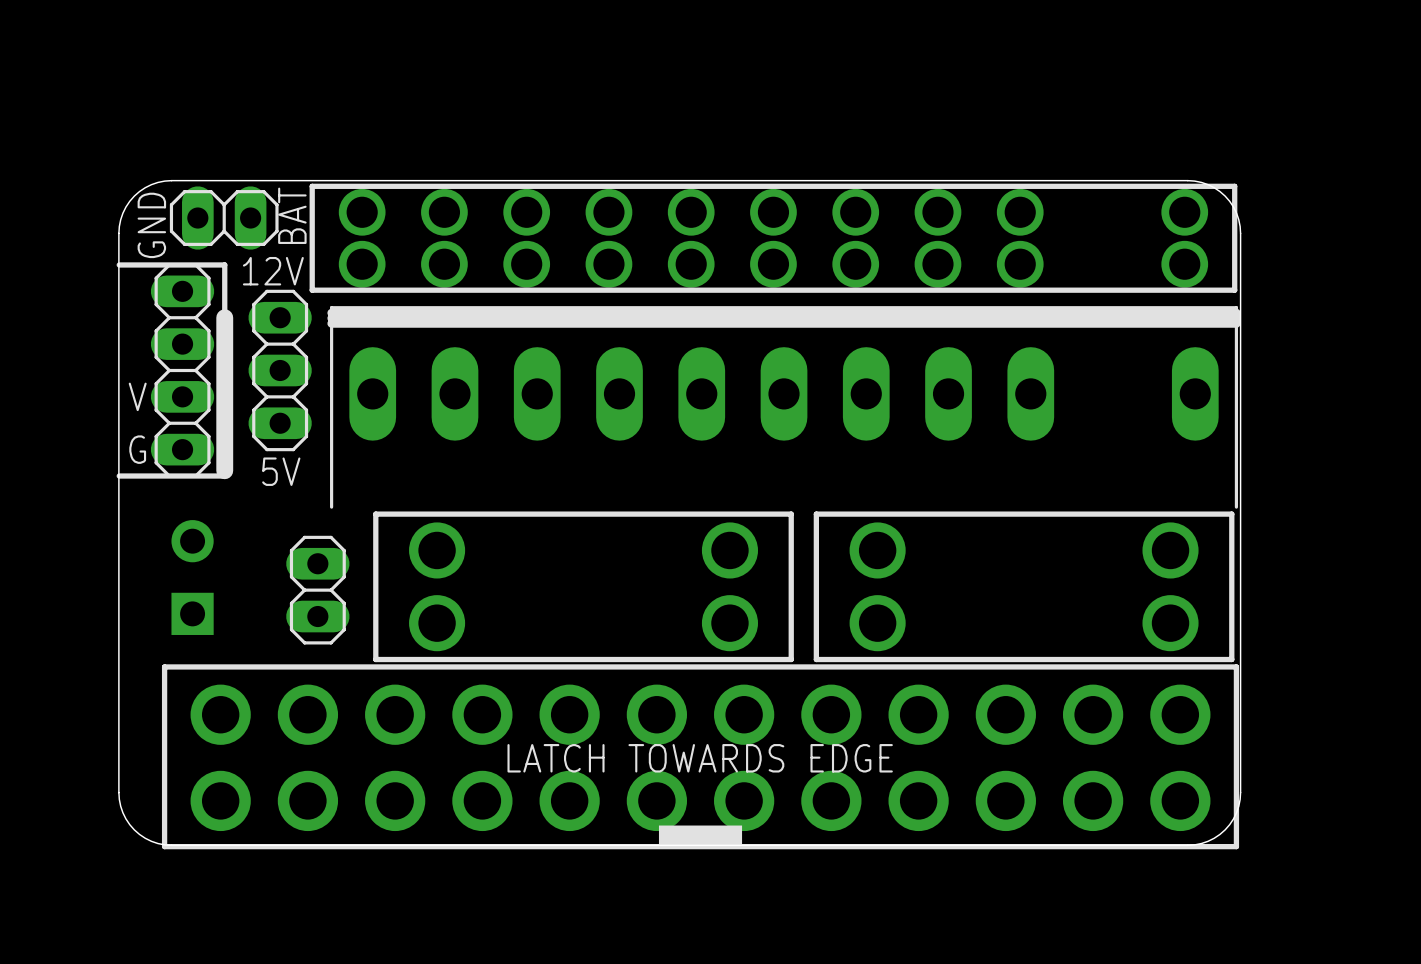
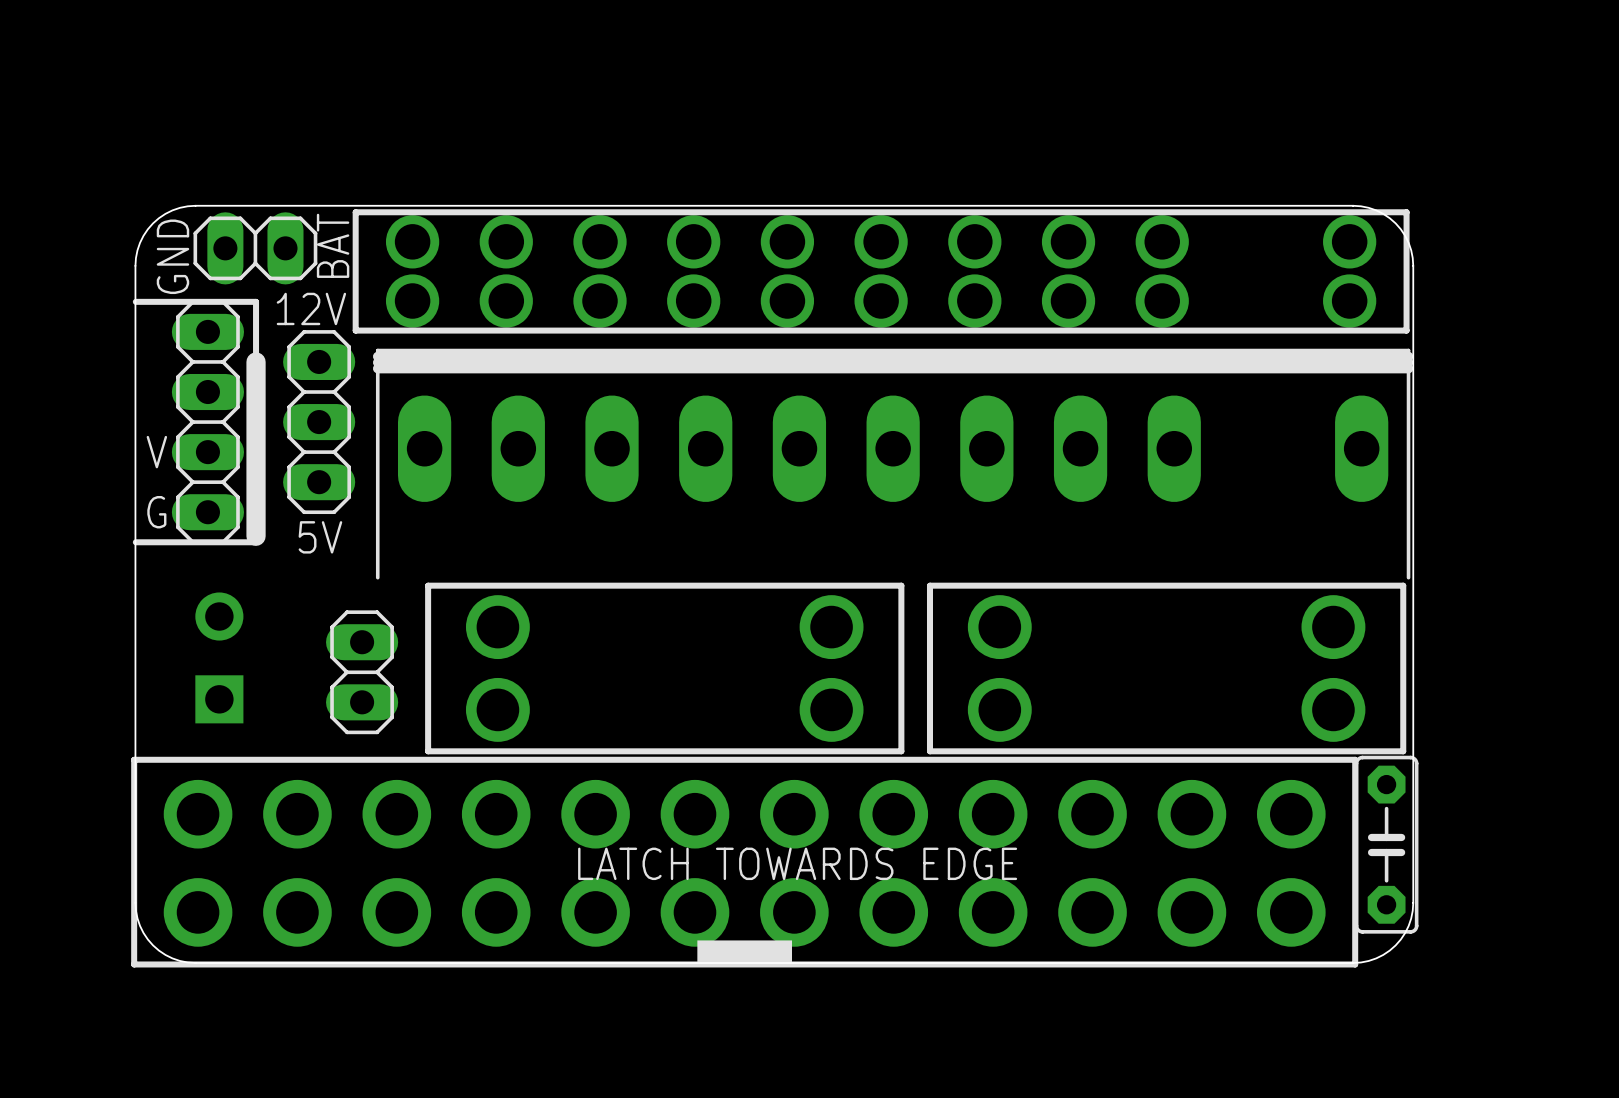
part: none -> (1386, 844)
part position: (700, 756) -> (744, 862)

